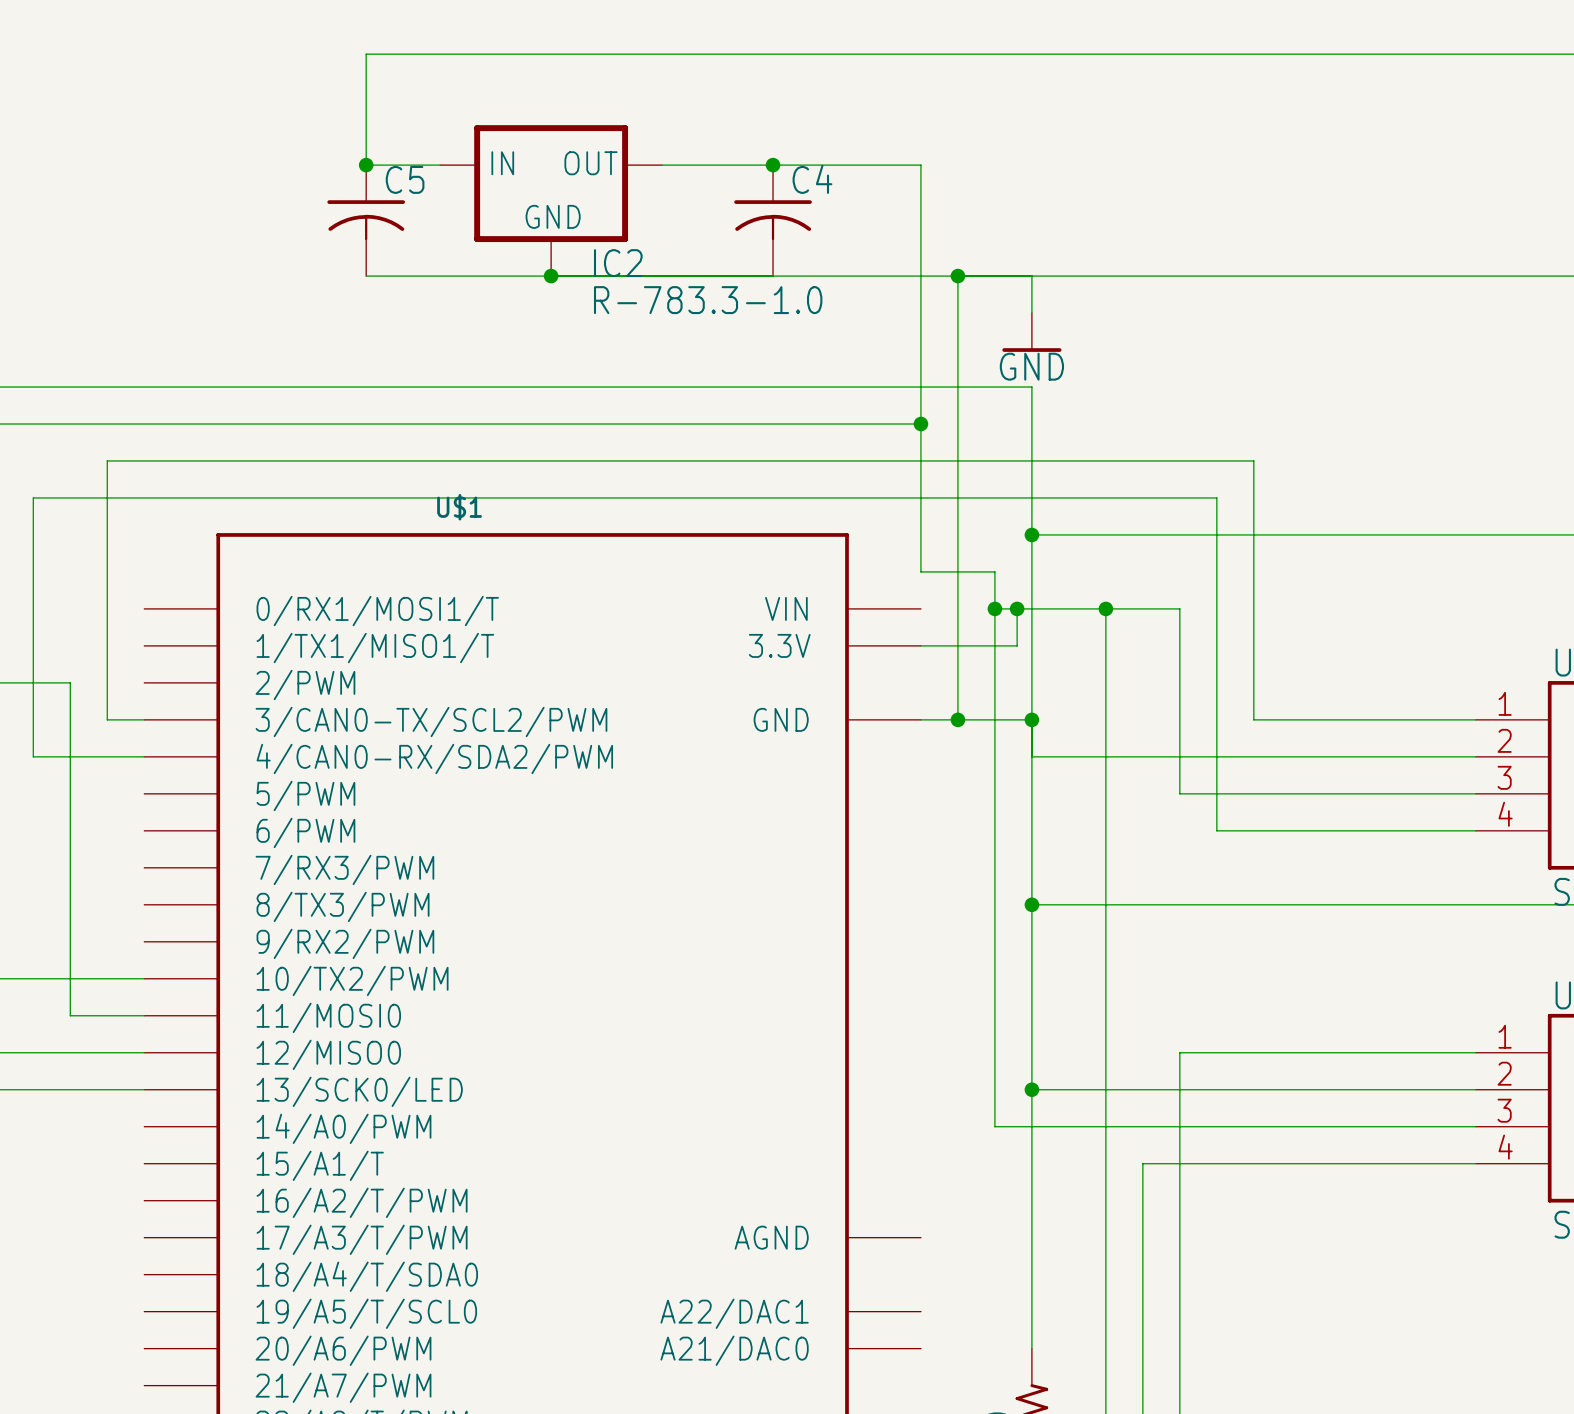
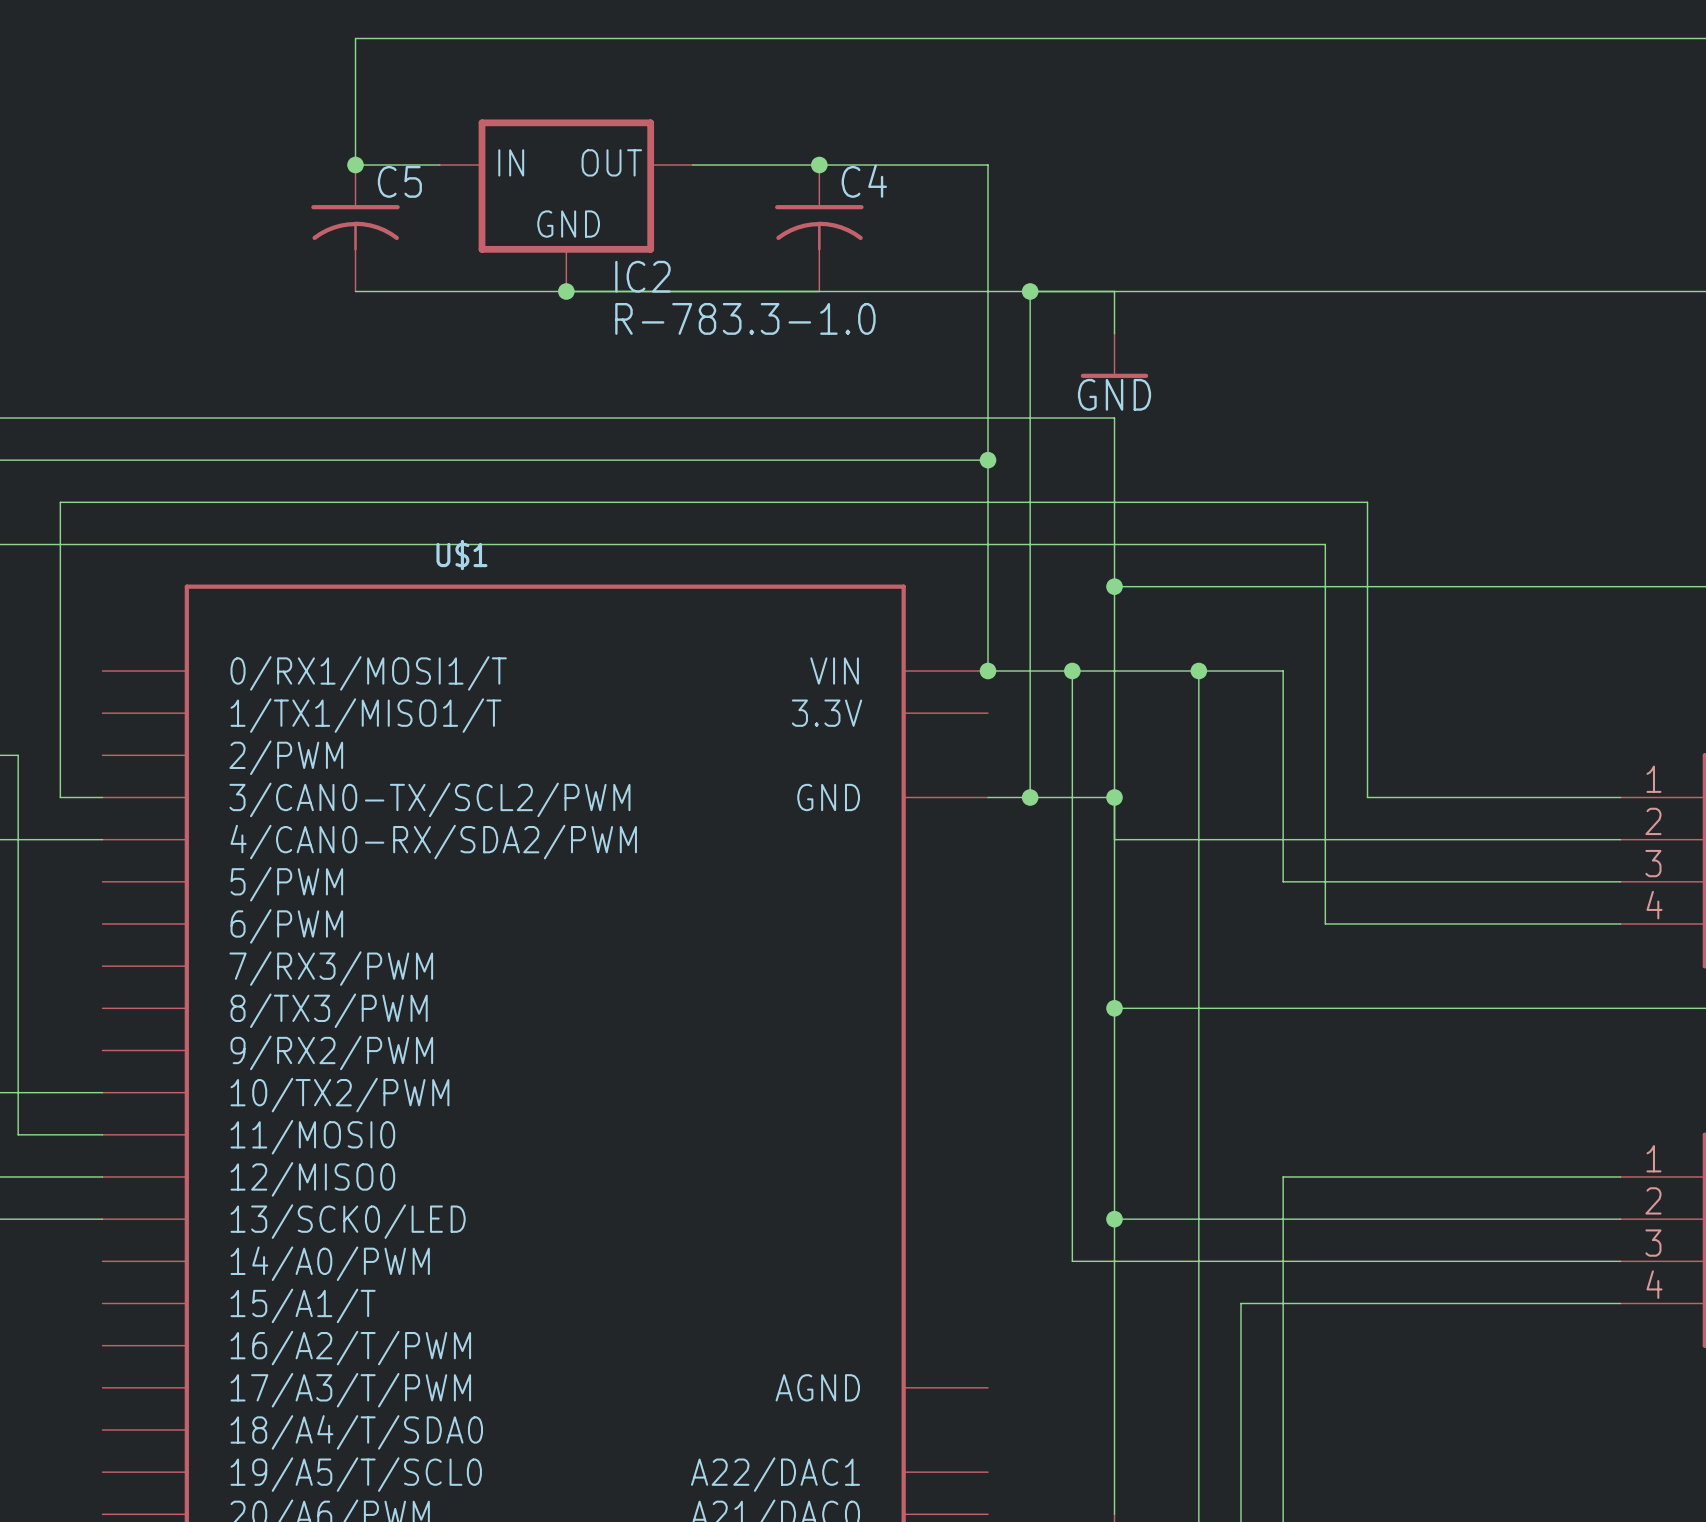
wire: (920, 571) (994, 571) (994, 608) -> (988, 628) (988, 671) (1072, 671)
junction: none -> (988, 671)
wire: (1017, 608) (1017, 645) (920, 645) -> none
junction: (1017, 608) -> none

